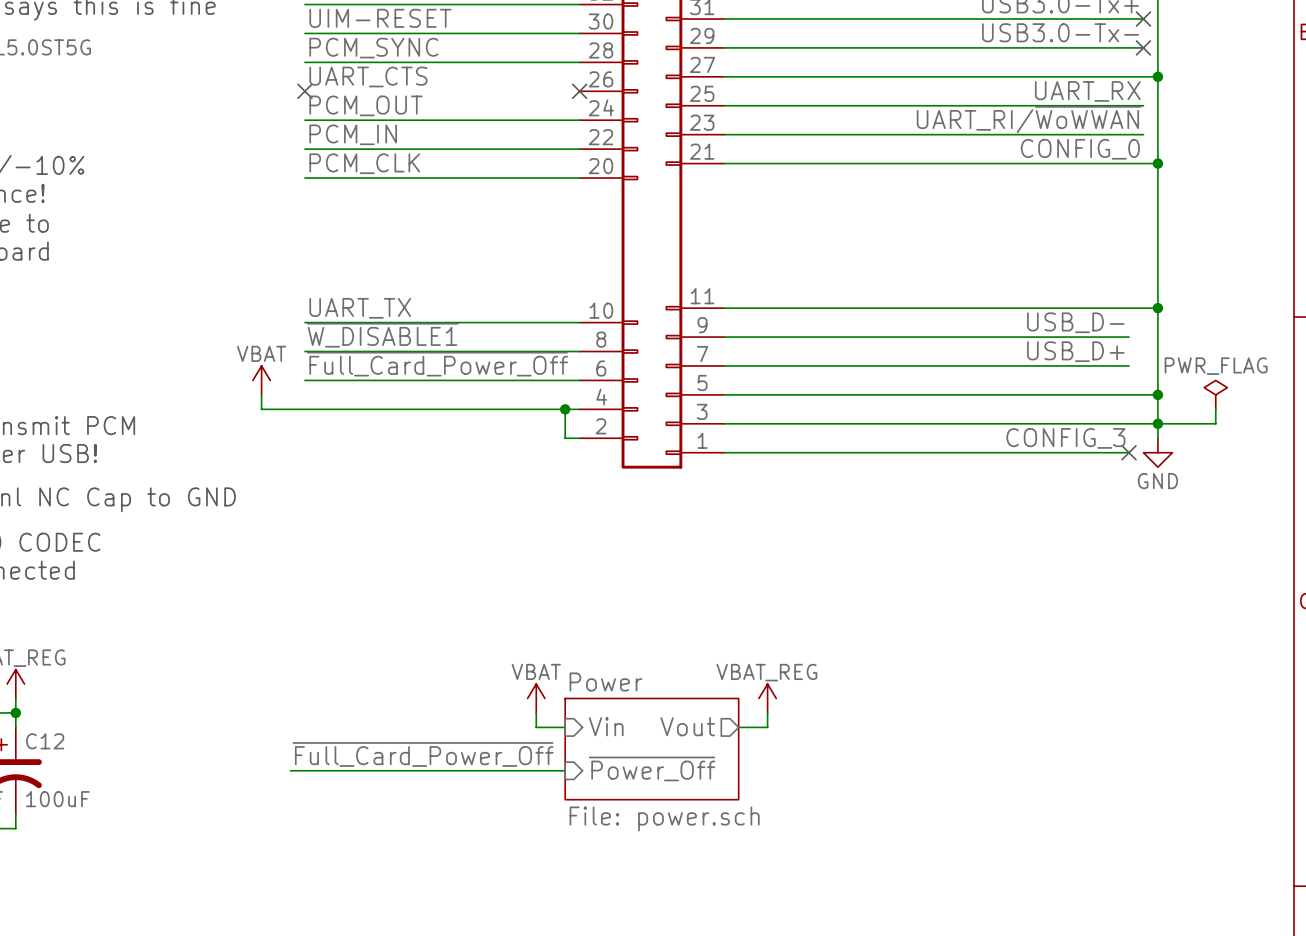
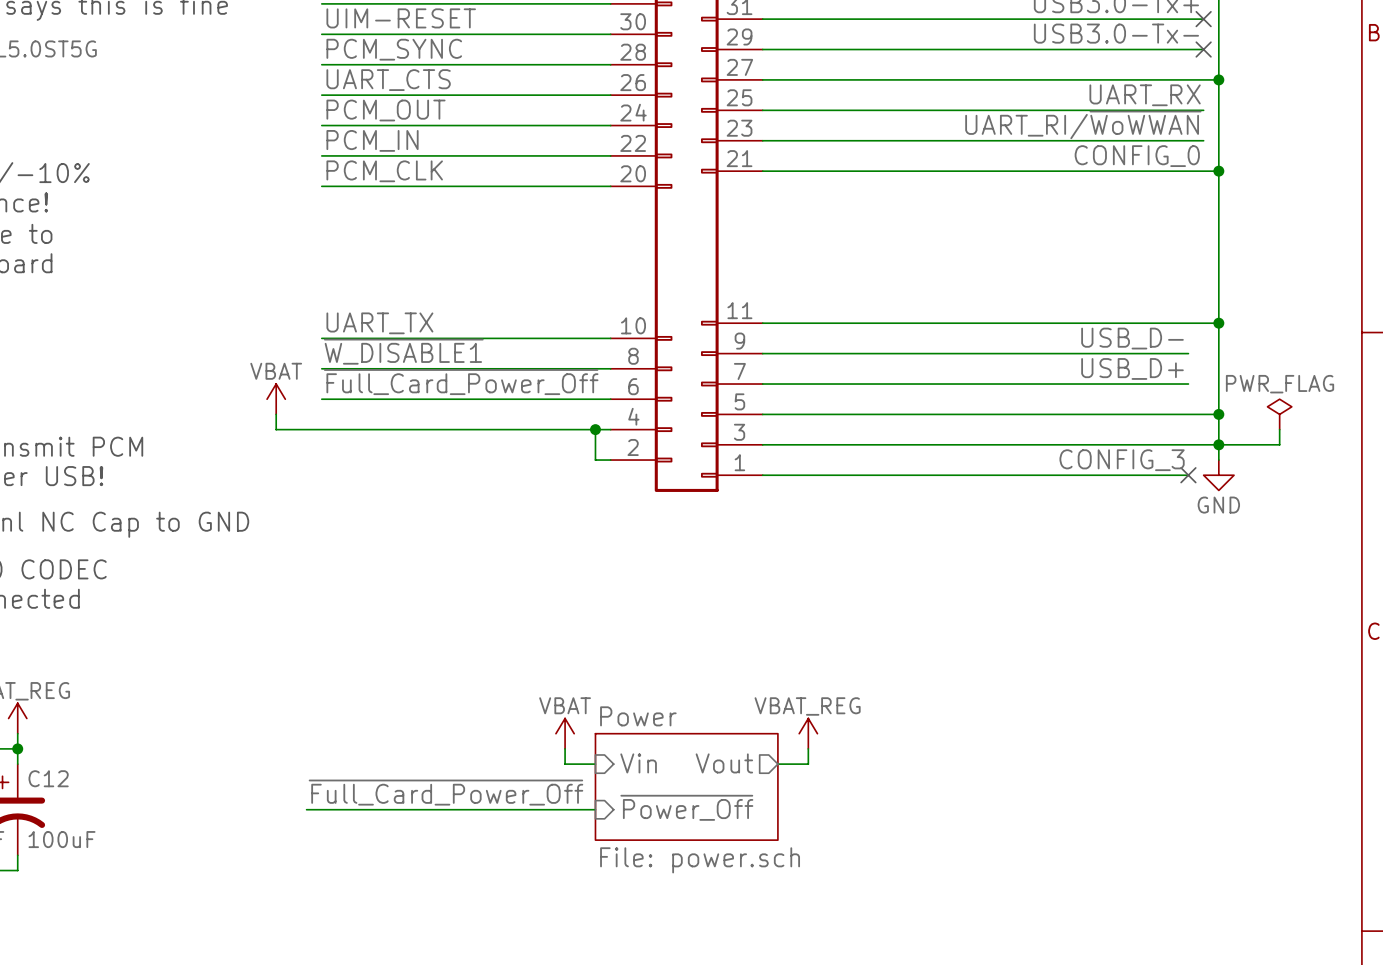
wire: none -> (321, 95) (610, 95)
no-connect mark: (304, 91) -> none
no-connect mark: (579, 91) -> none

